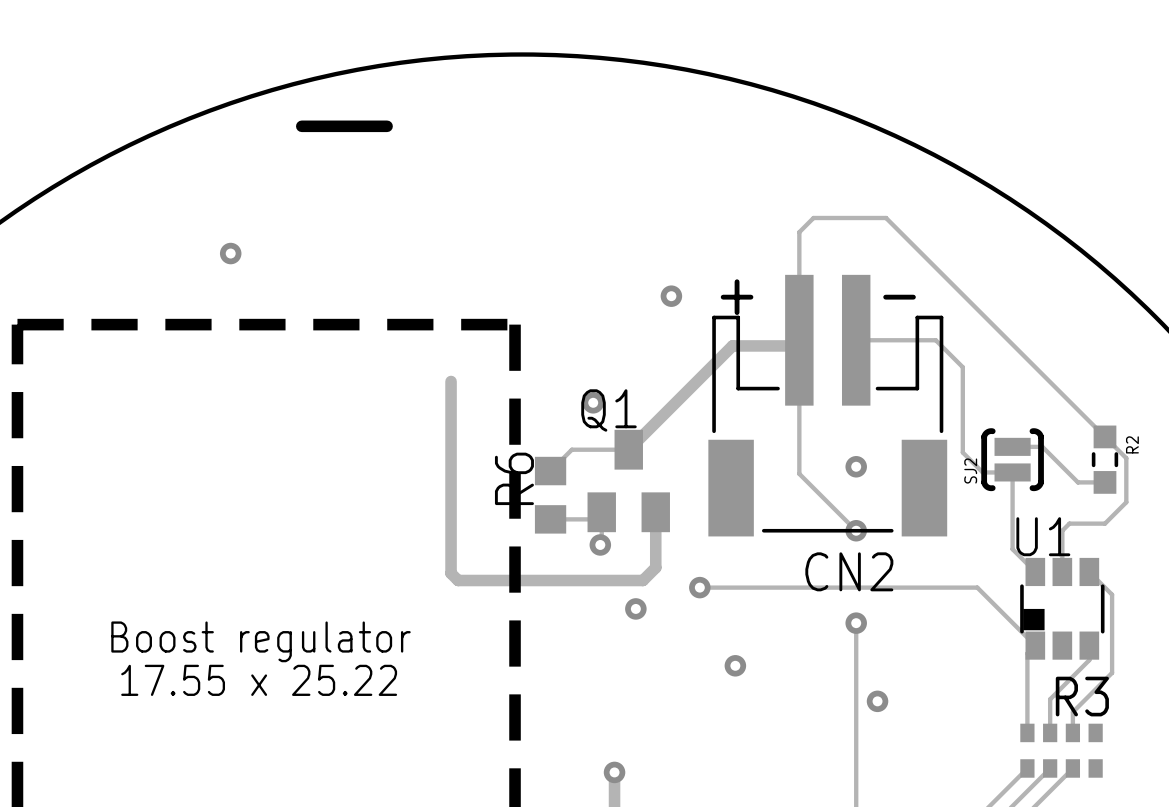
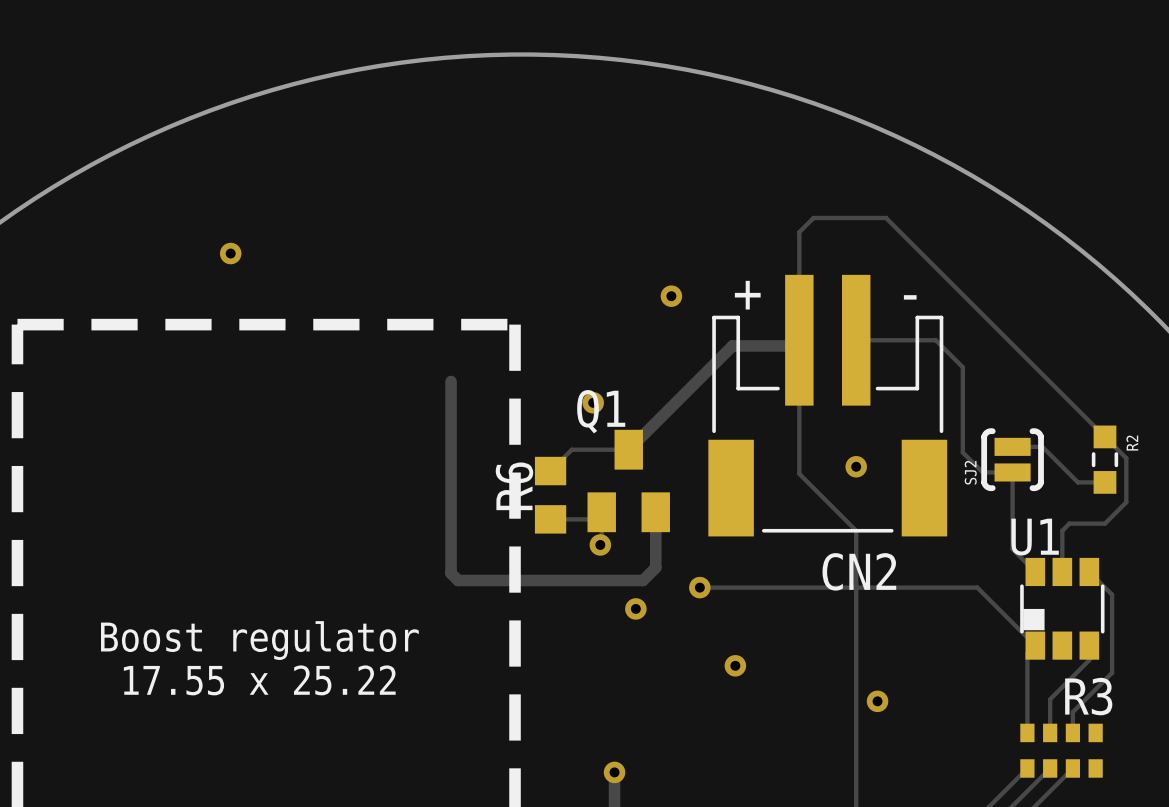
line: (387, 126) (301, 126) -> none
track: none -> (856, 530) (856, 623)
via: (856, 530) -> none
via: (856, 623) -> none

